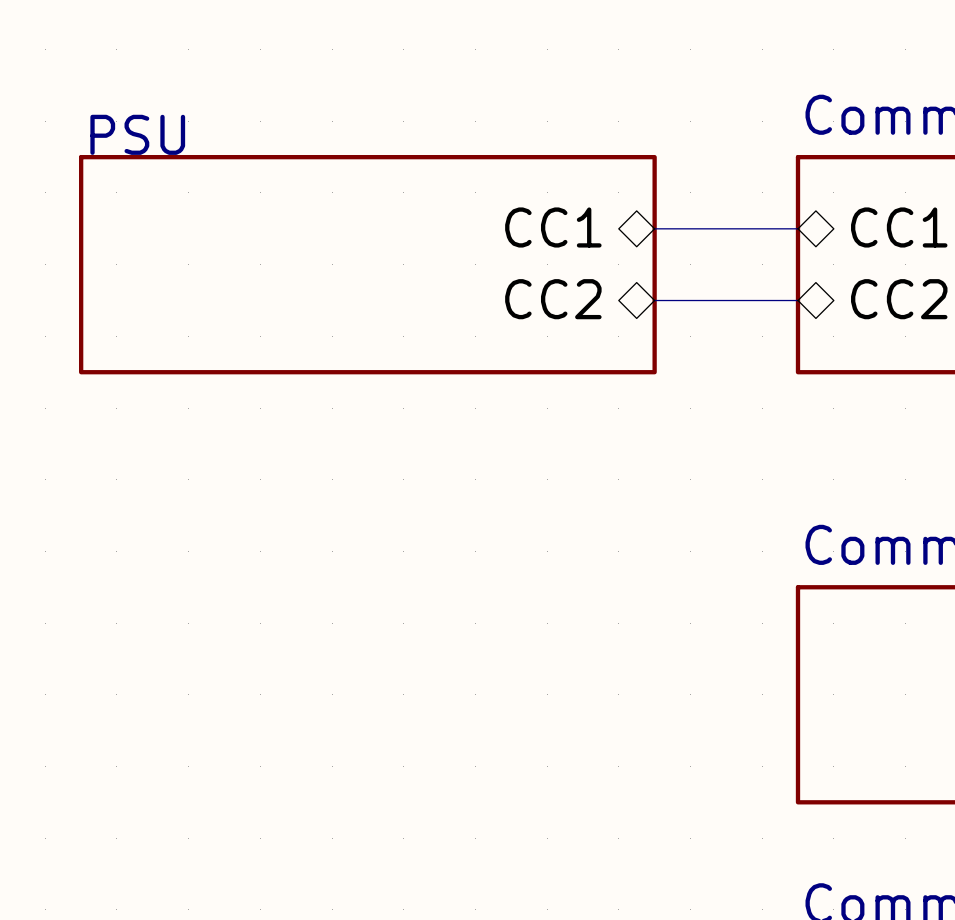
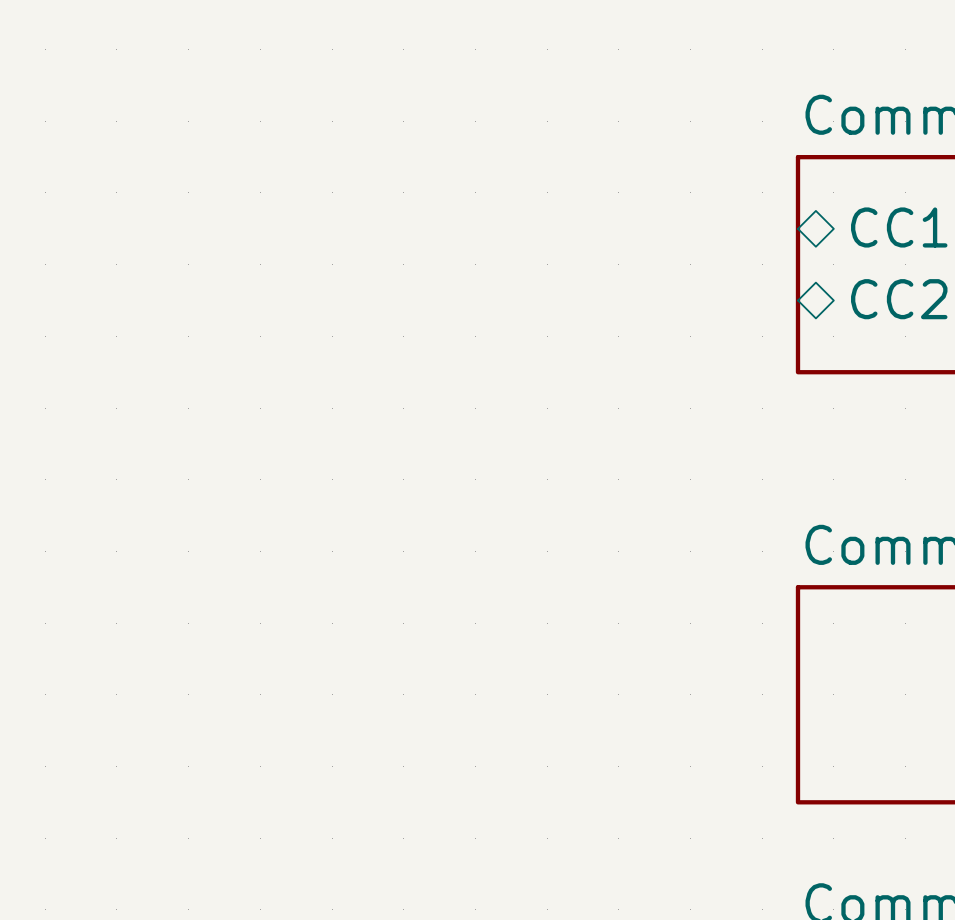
sheet pin: CC1 (553, 227) -> none
wire: (654, 228) (797, 228) -> none
sheet PSU: (367, 264) -> none
sheet pin: CC2 (553, 299) -> none
wire: (654, 300) (797, 300) -> none

